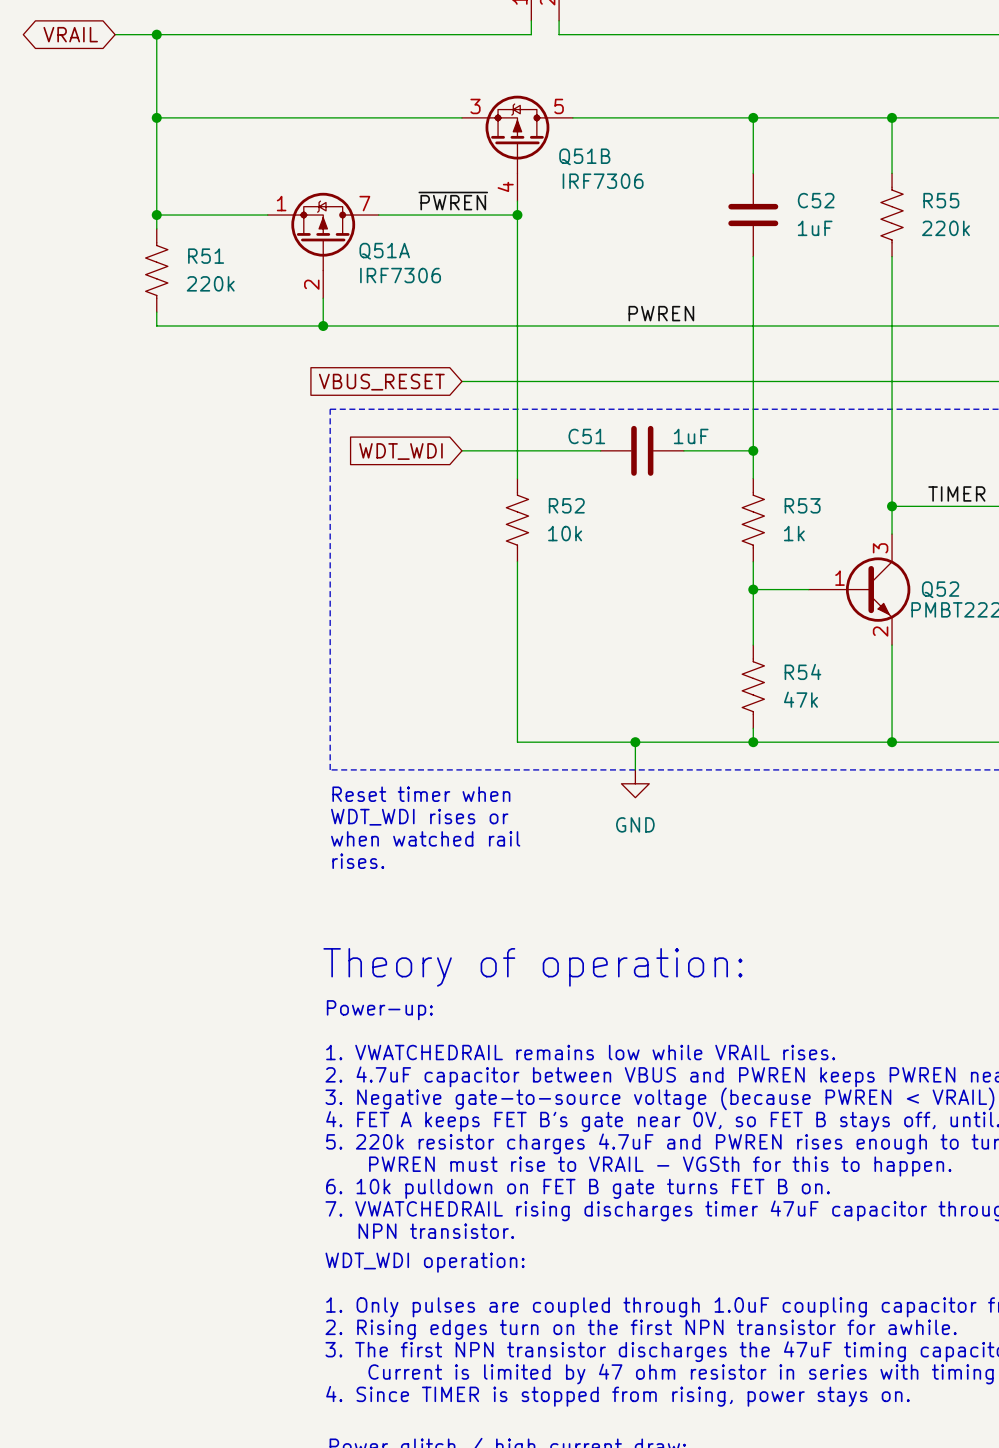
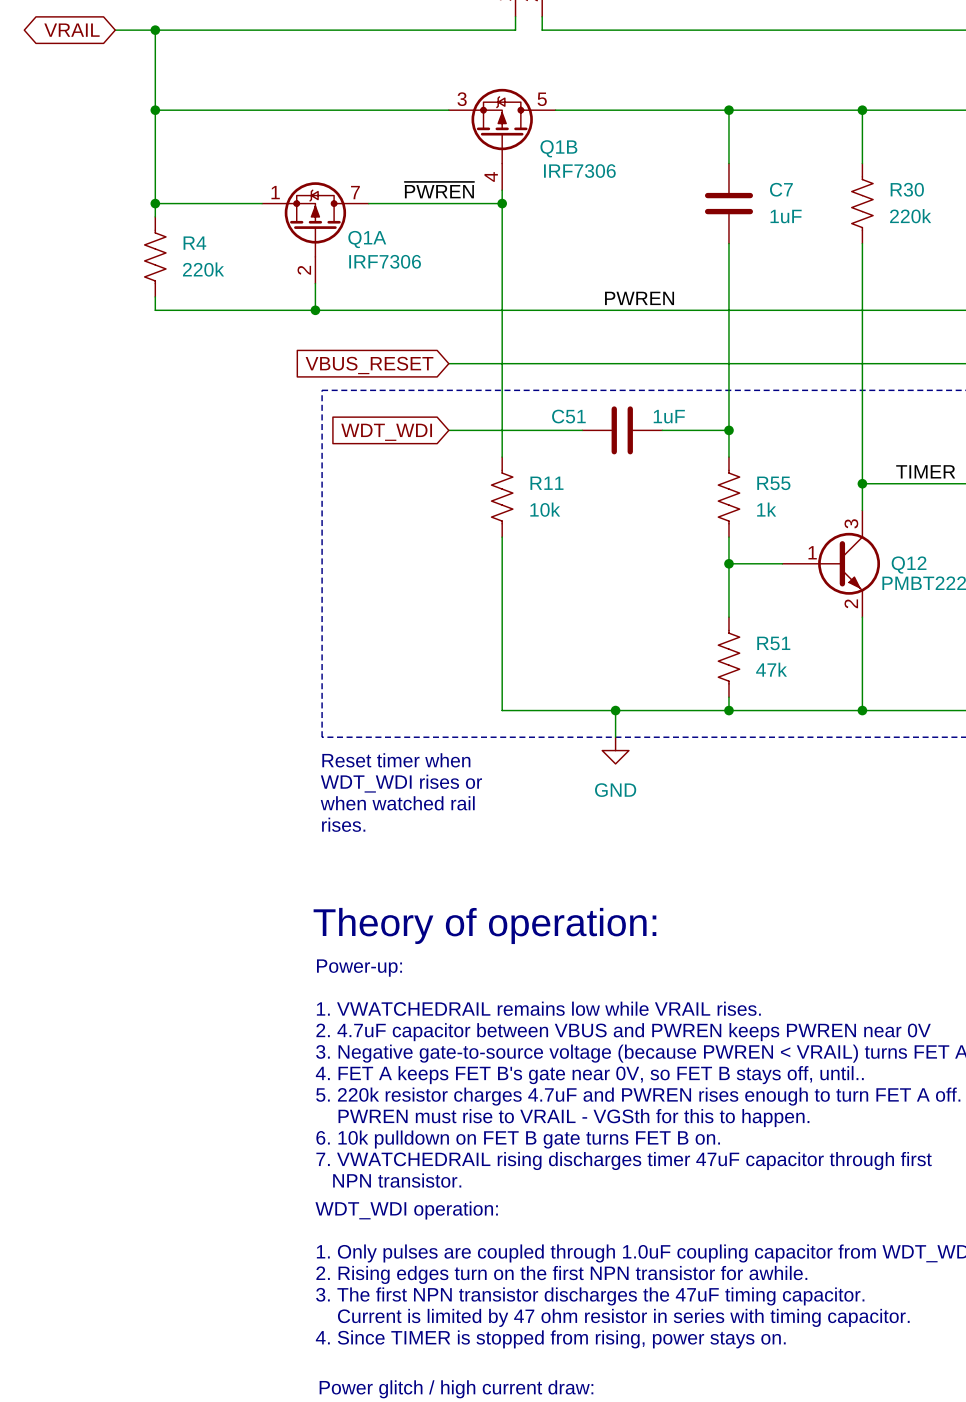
Q51B name: Q51B (584, 156) -> Q1B (558, 148)
C52 name: C52 (816, 200) -> C7 (781, 189)
R55 name: R55 (941, 200) -> R30 (907, 189)
Q51A name: Q51A (384, 251) -> Q1A (367, 239)
R51 name: R51 (206, 256) -> R4 (194, 243)
R52 name: R52 (566, 505) -> R11 (546, 483)
R53 name: R53 (802, 505) -> R55 (773, 483)
Q52 name: Q52 (940, 589) -> Q12 (909, 565)
R54 name: R54 (802, 671) -> R51 (773, 643)

